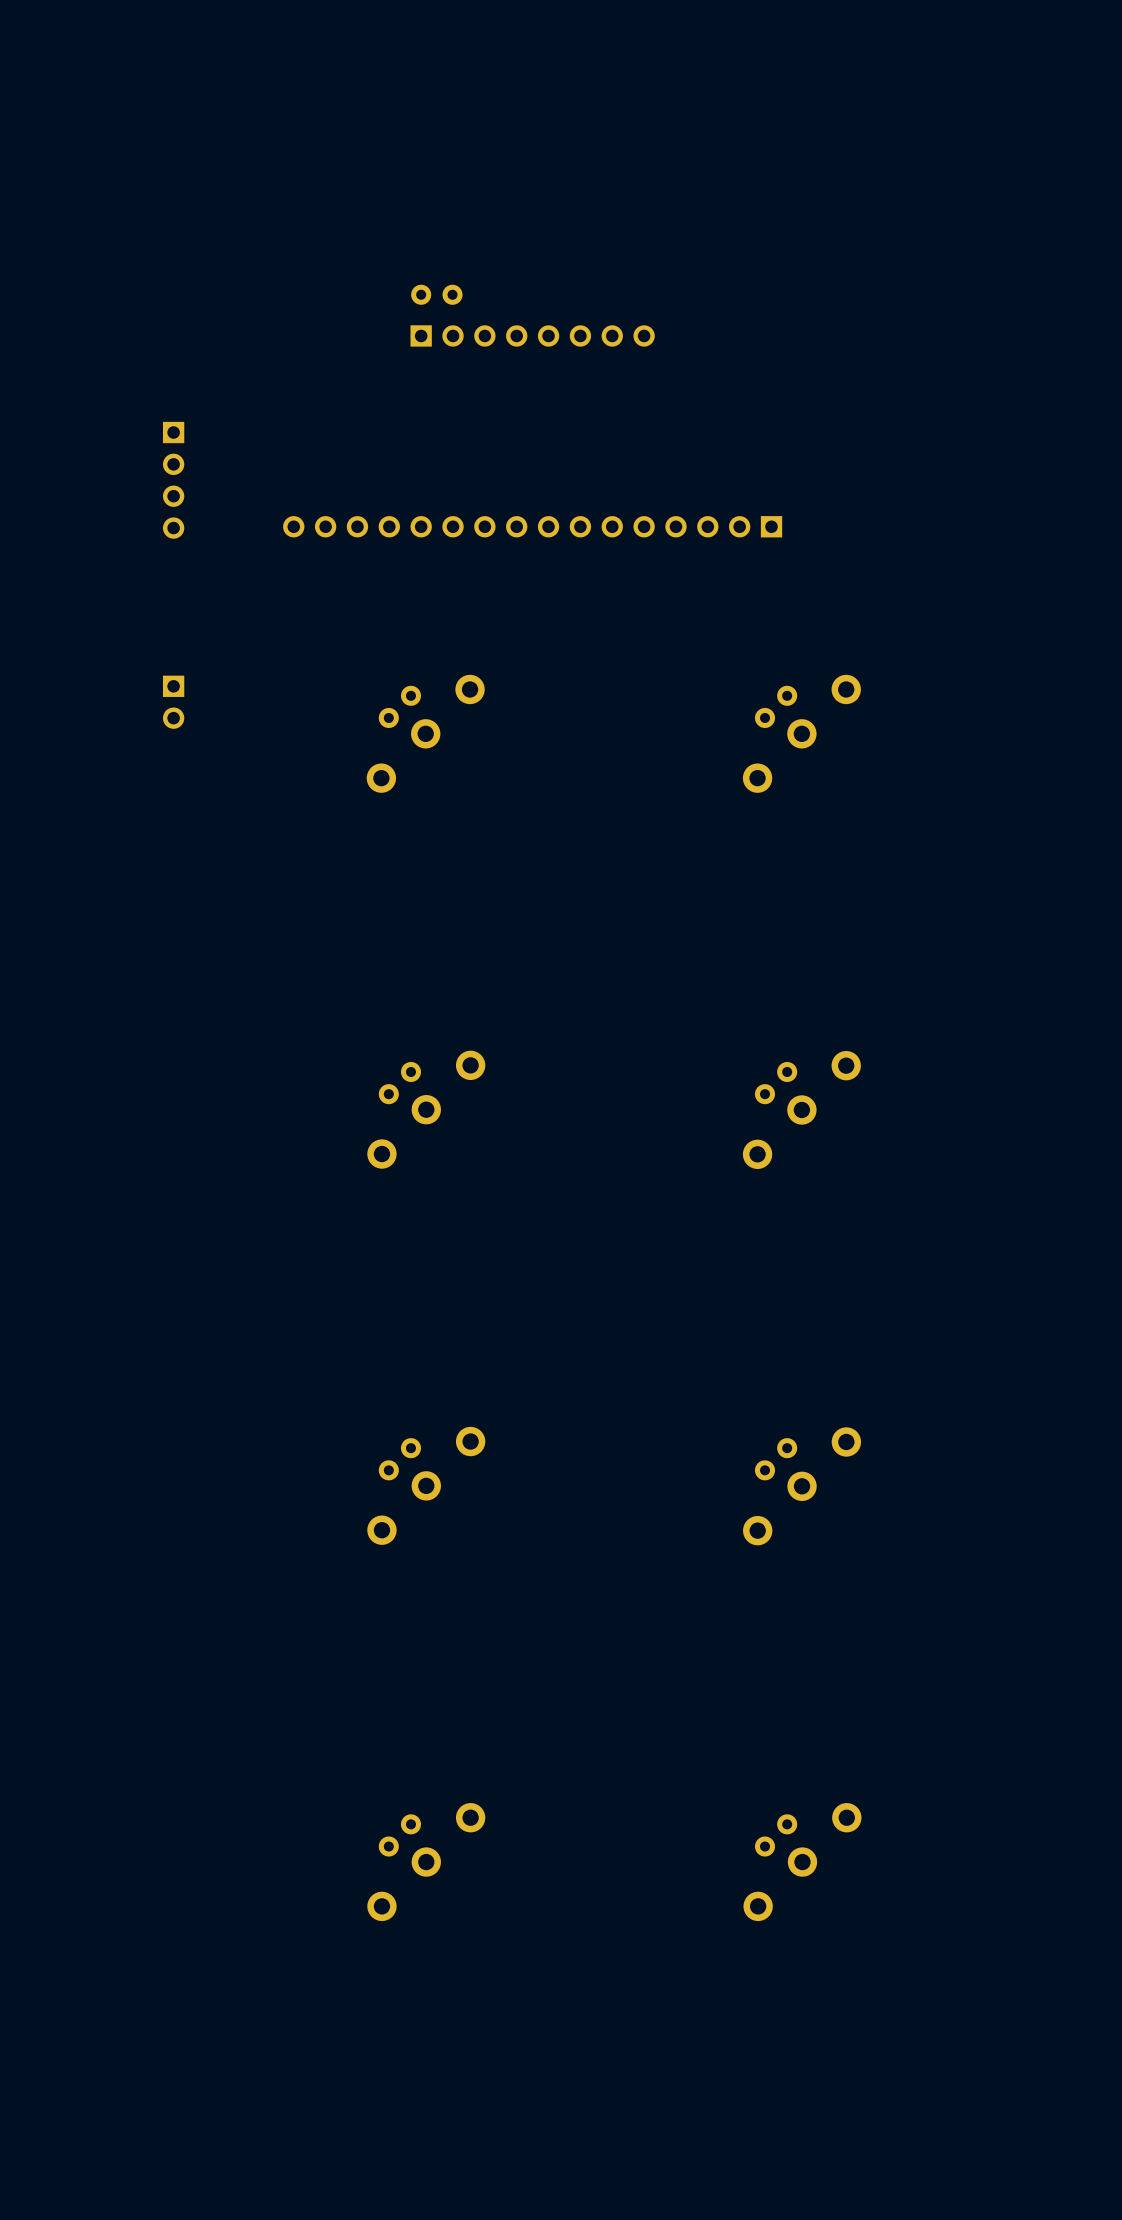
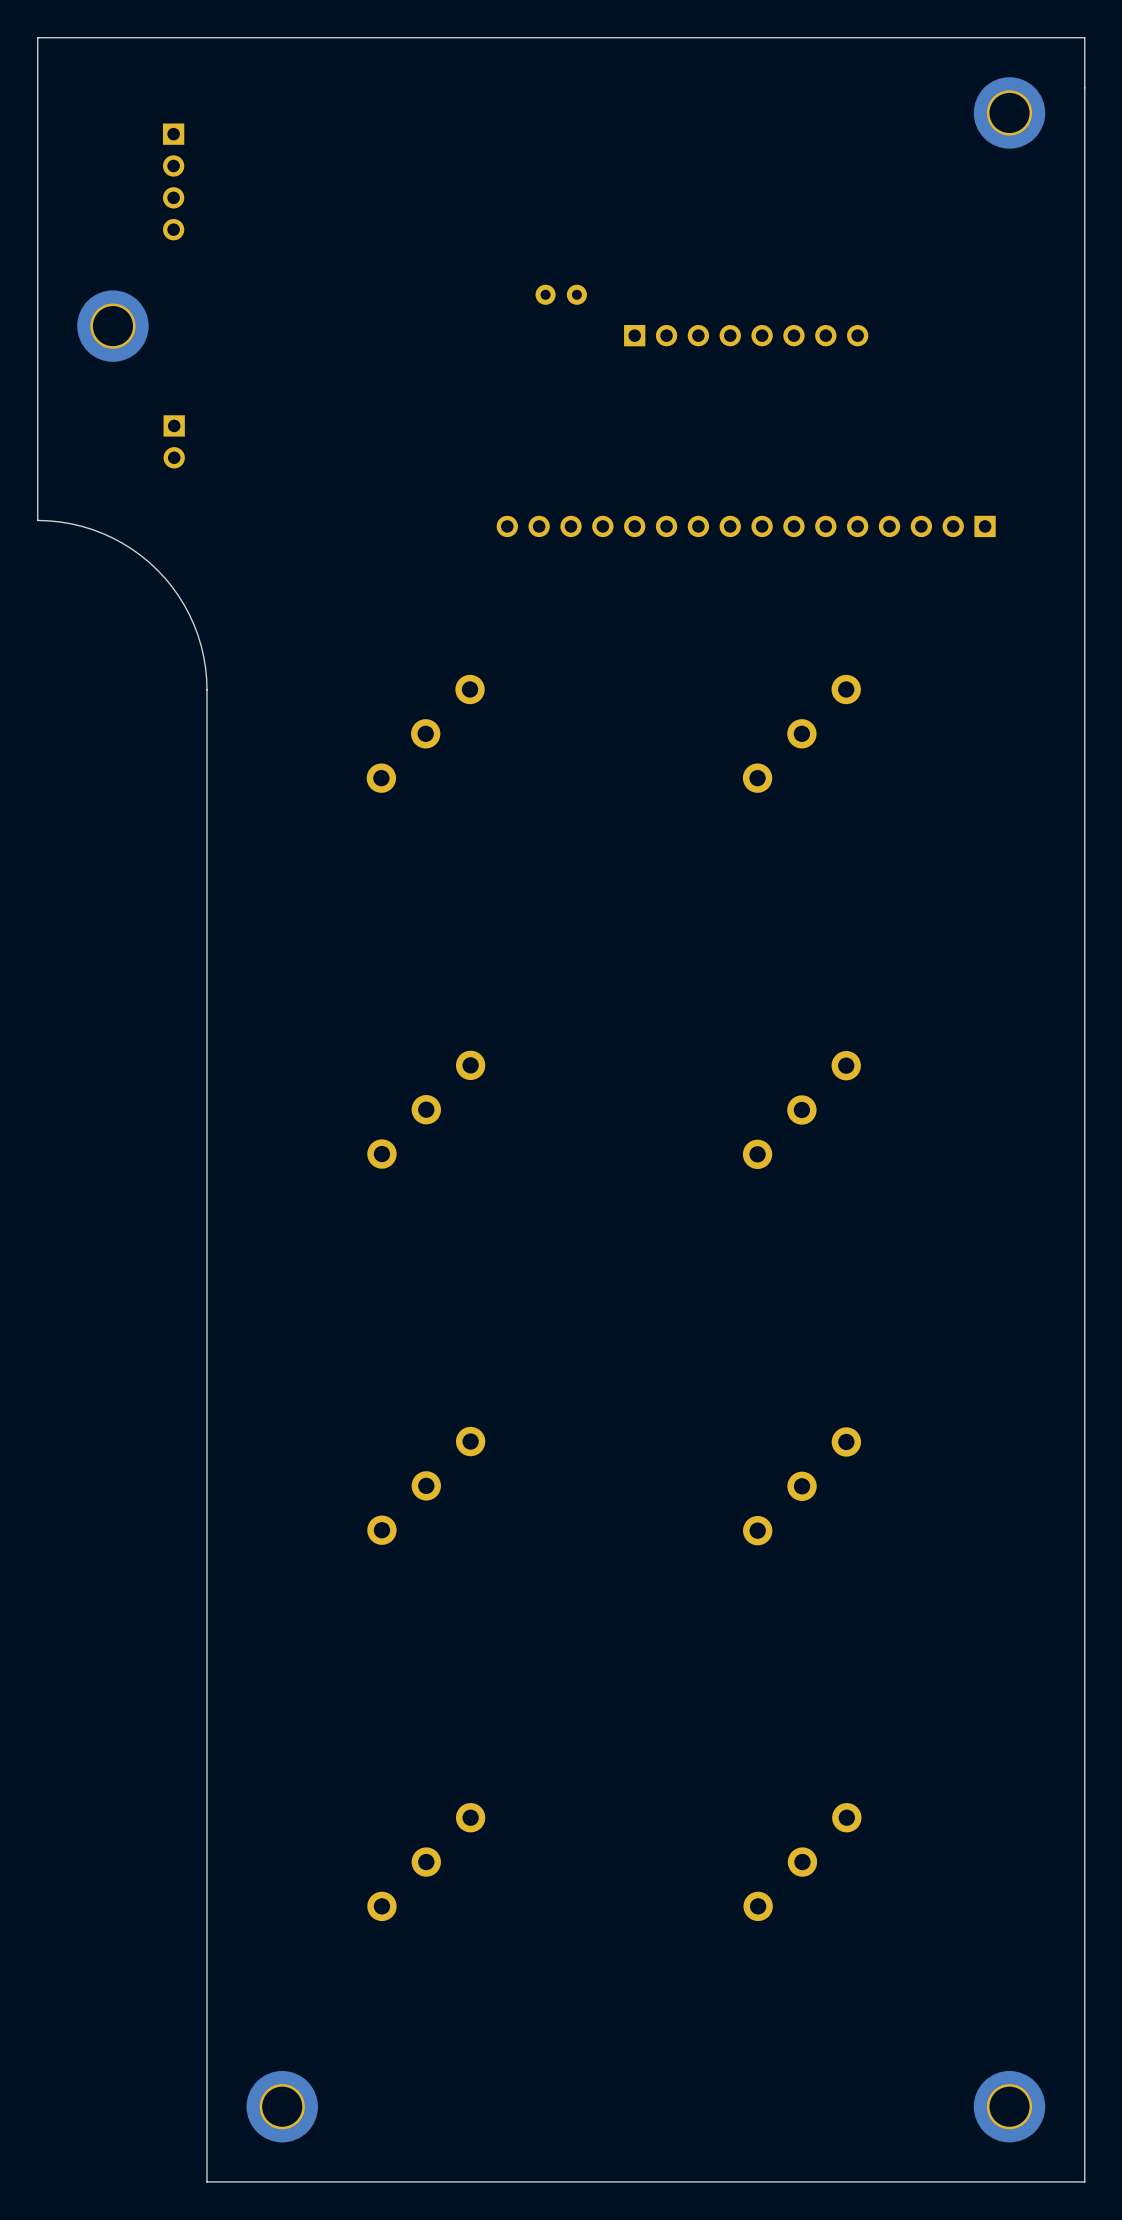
board edge: none -> (1084, 37) (1084, 2181) (206, 2181) (206, 678) (201, 645) (189, 614) (178, 595) (157, 570) (131, 549) (102, 533) (70, 523) (37, 520) (37, 37) (1084, 37)
part: none -> (1009, 112)
part position: (436, 294) -> (561, 294)
part: none -> (112, 326)
part position: (532, 335) -> (746, 335)
part position: (173, 480) -> (173, 181)
part position: (532, 526) -> (746, 526)
part position: (173, 702) -> (174, 441)
part: (399, 706) -> none
part: (776, 706) -> none
part: (399, 1083) -> none
part: (776, 1083) -> none
part: (399, 1459) -> none
part: (776, 1459) -> none
part: (399, 1835) -> none
part: (776, 1835) -> none
part: none -> (282, 2106)
part: none -> (1009, 2106)

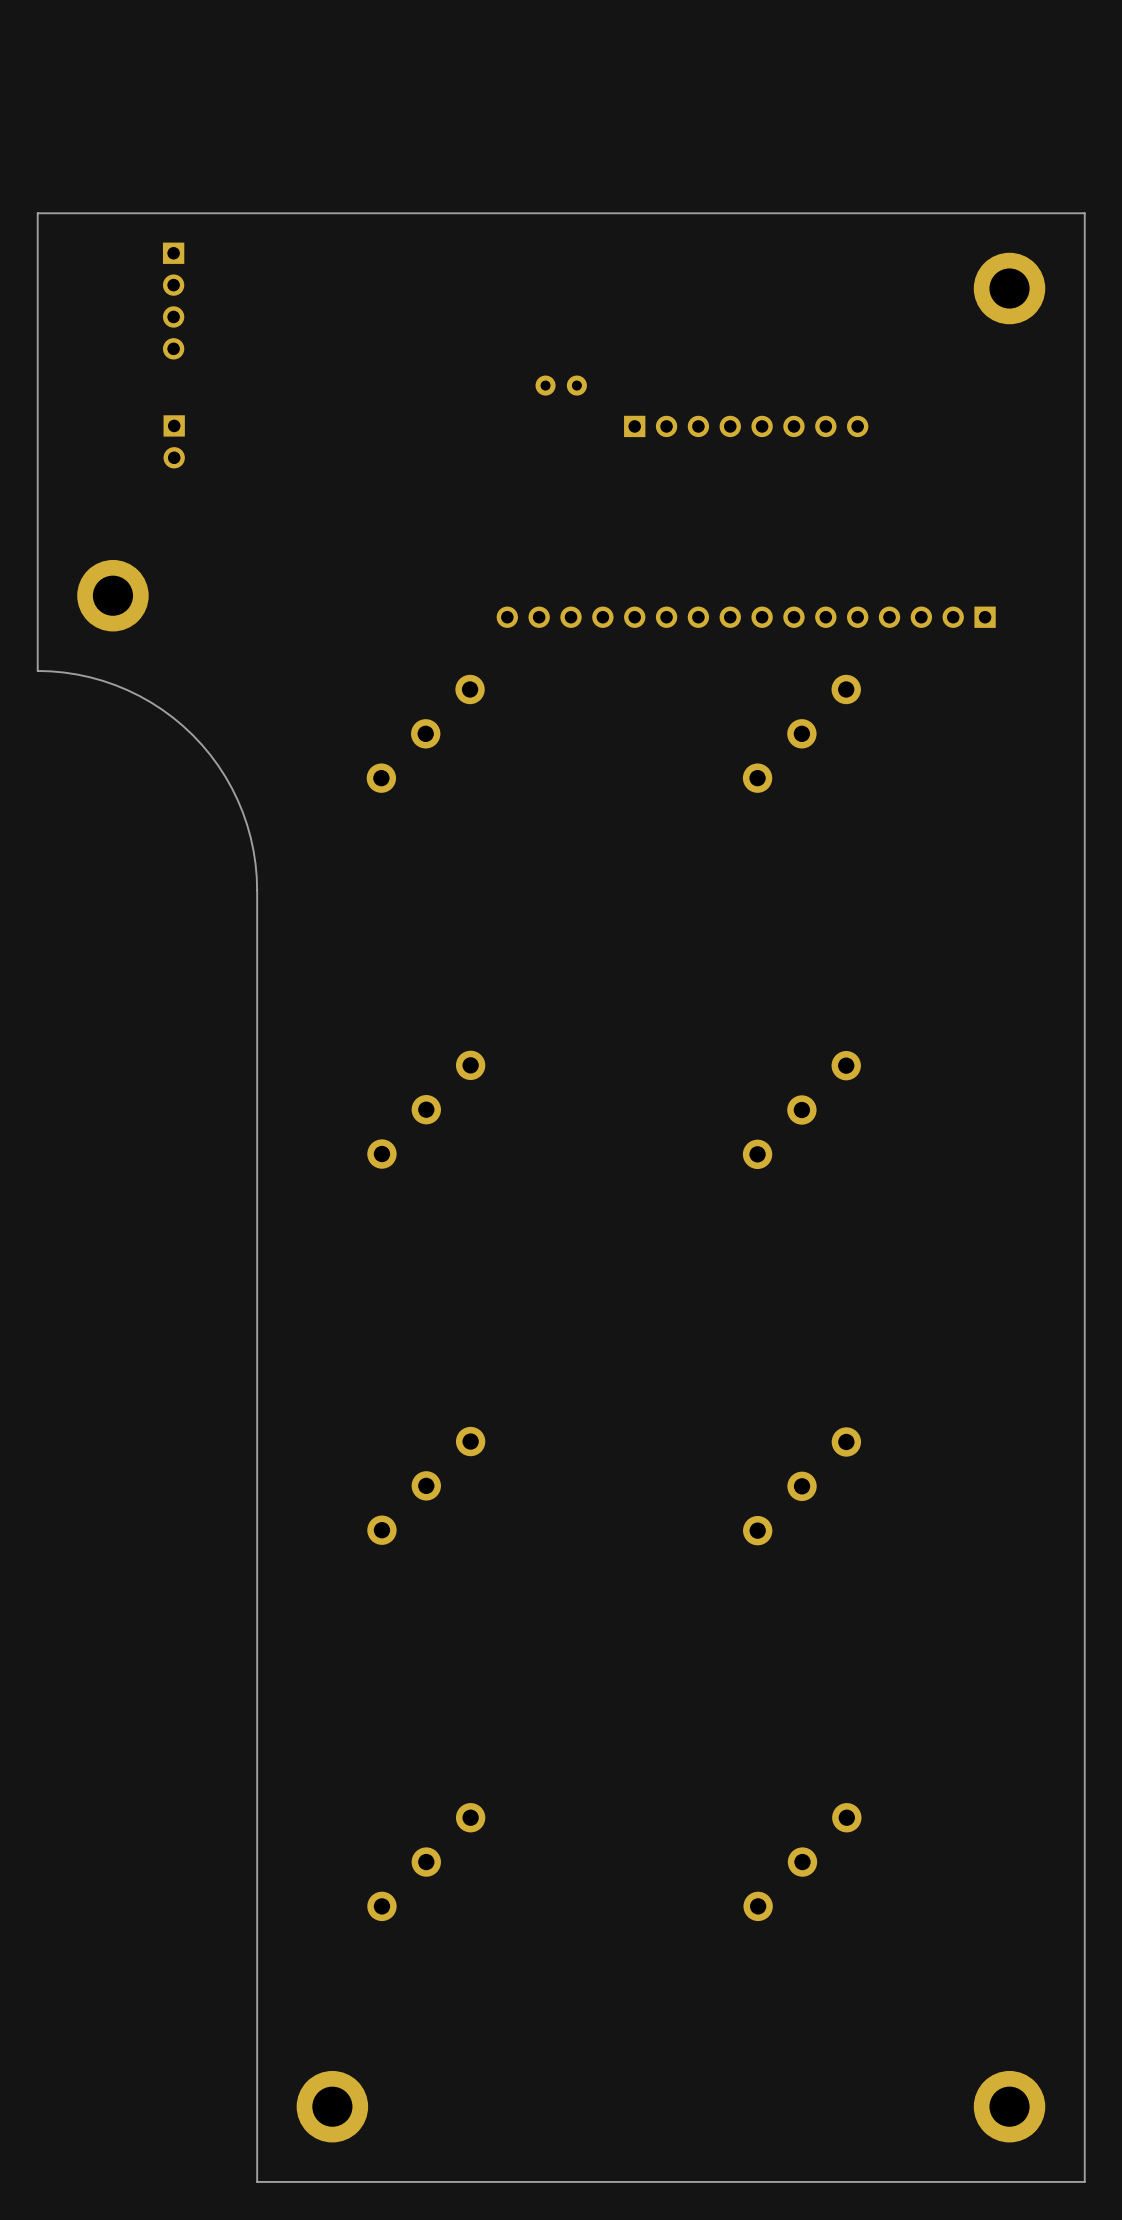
part position: (1009, 112) -> (1009, 288)
part position: (173, 181) -> (173, 301)
board edge: (1084, 213) (1084, 37) (37, 37) (37, 213) -> (1084, 213) (37, 213)
part position: (561, 294) -> (561, 385)
part position: (112, 326) -> (112, 595)
part position: (746, 335) -> (746, 426)
board edge: (37, 520) (70, 523) (102, 533) (131, 549) (149, 562) (172, 586) (189, 614) (198, 635) (205, 667) (206, 2181) (257, 2181) -> (37, 520) (37, 670) (77, 674) (115, 685) (151, 702) (183, 726) (210, 755) (232, 788) (247, 825) (255, 863) (257, 890) (257, 2181)
part position: (746, 526) -> (746, 617)
part position: (282, 2106) -> (332, 2106)

